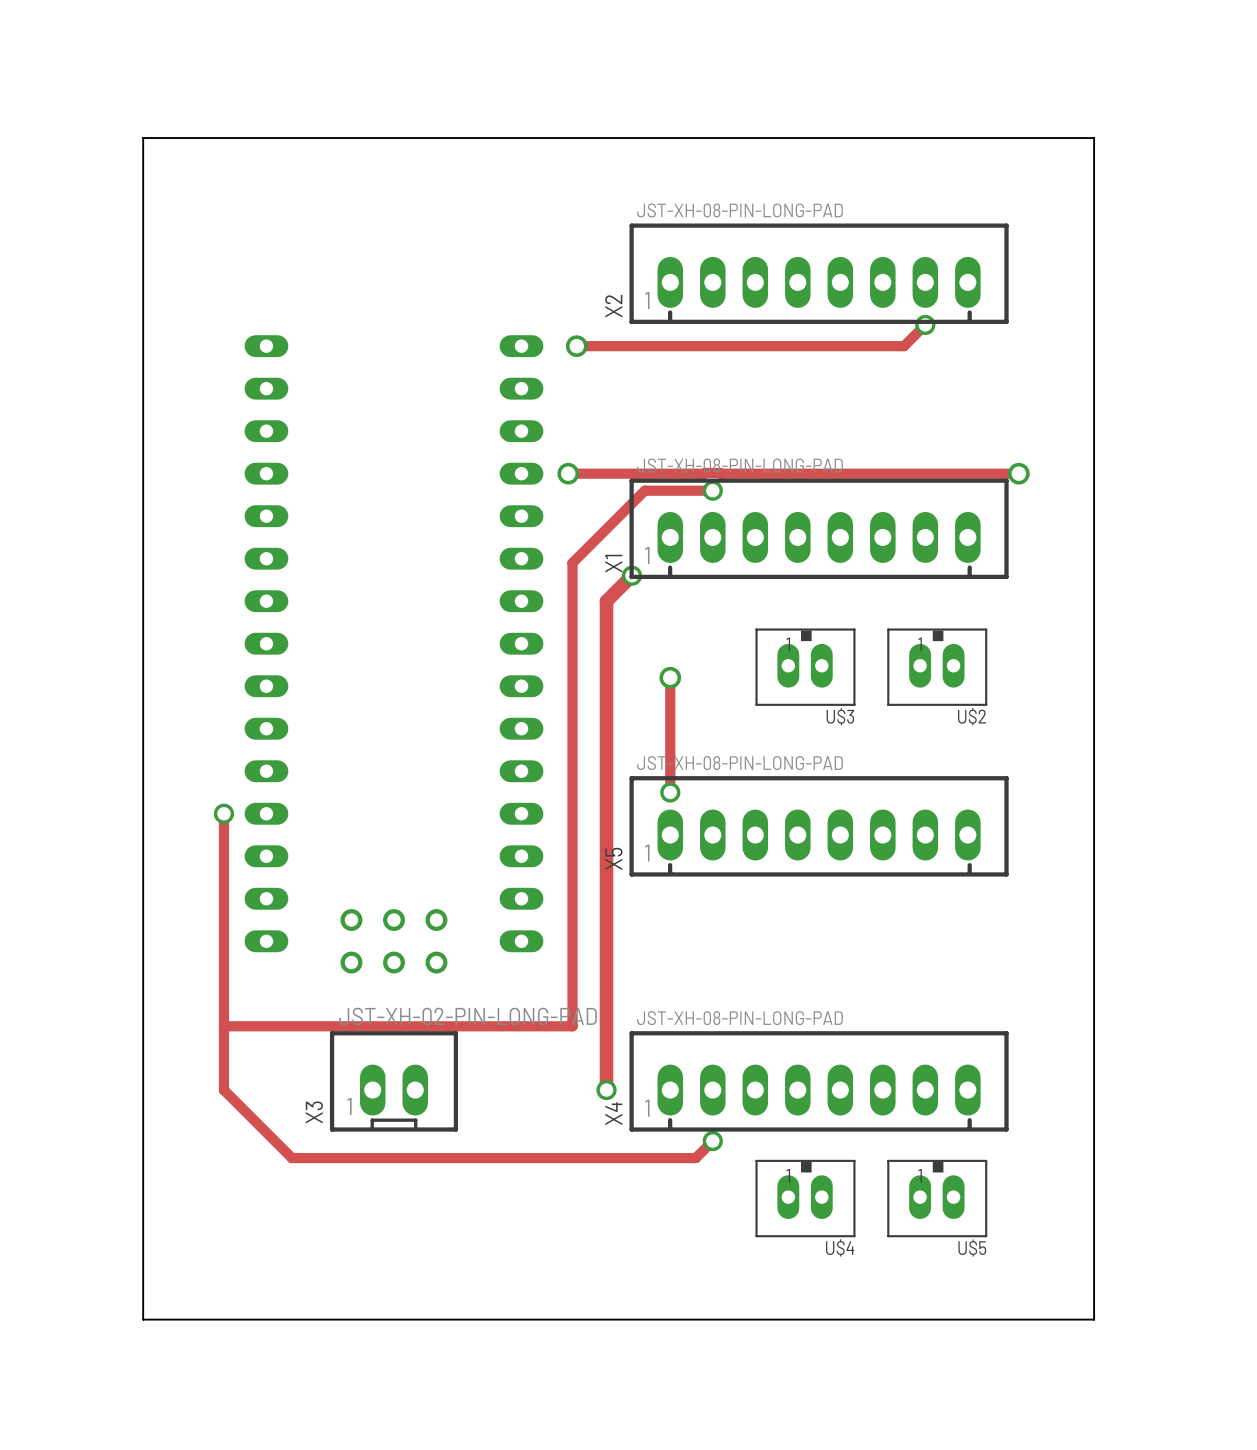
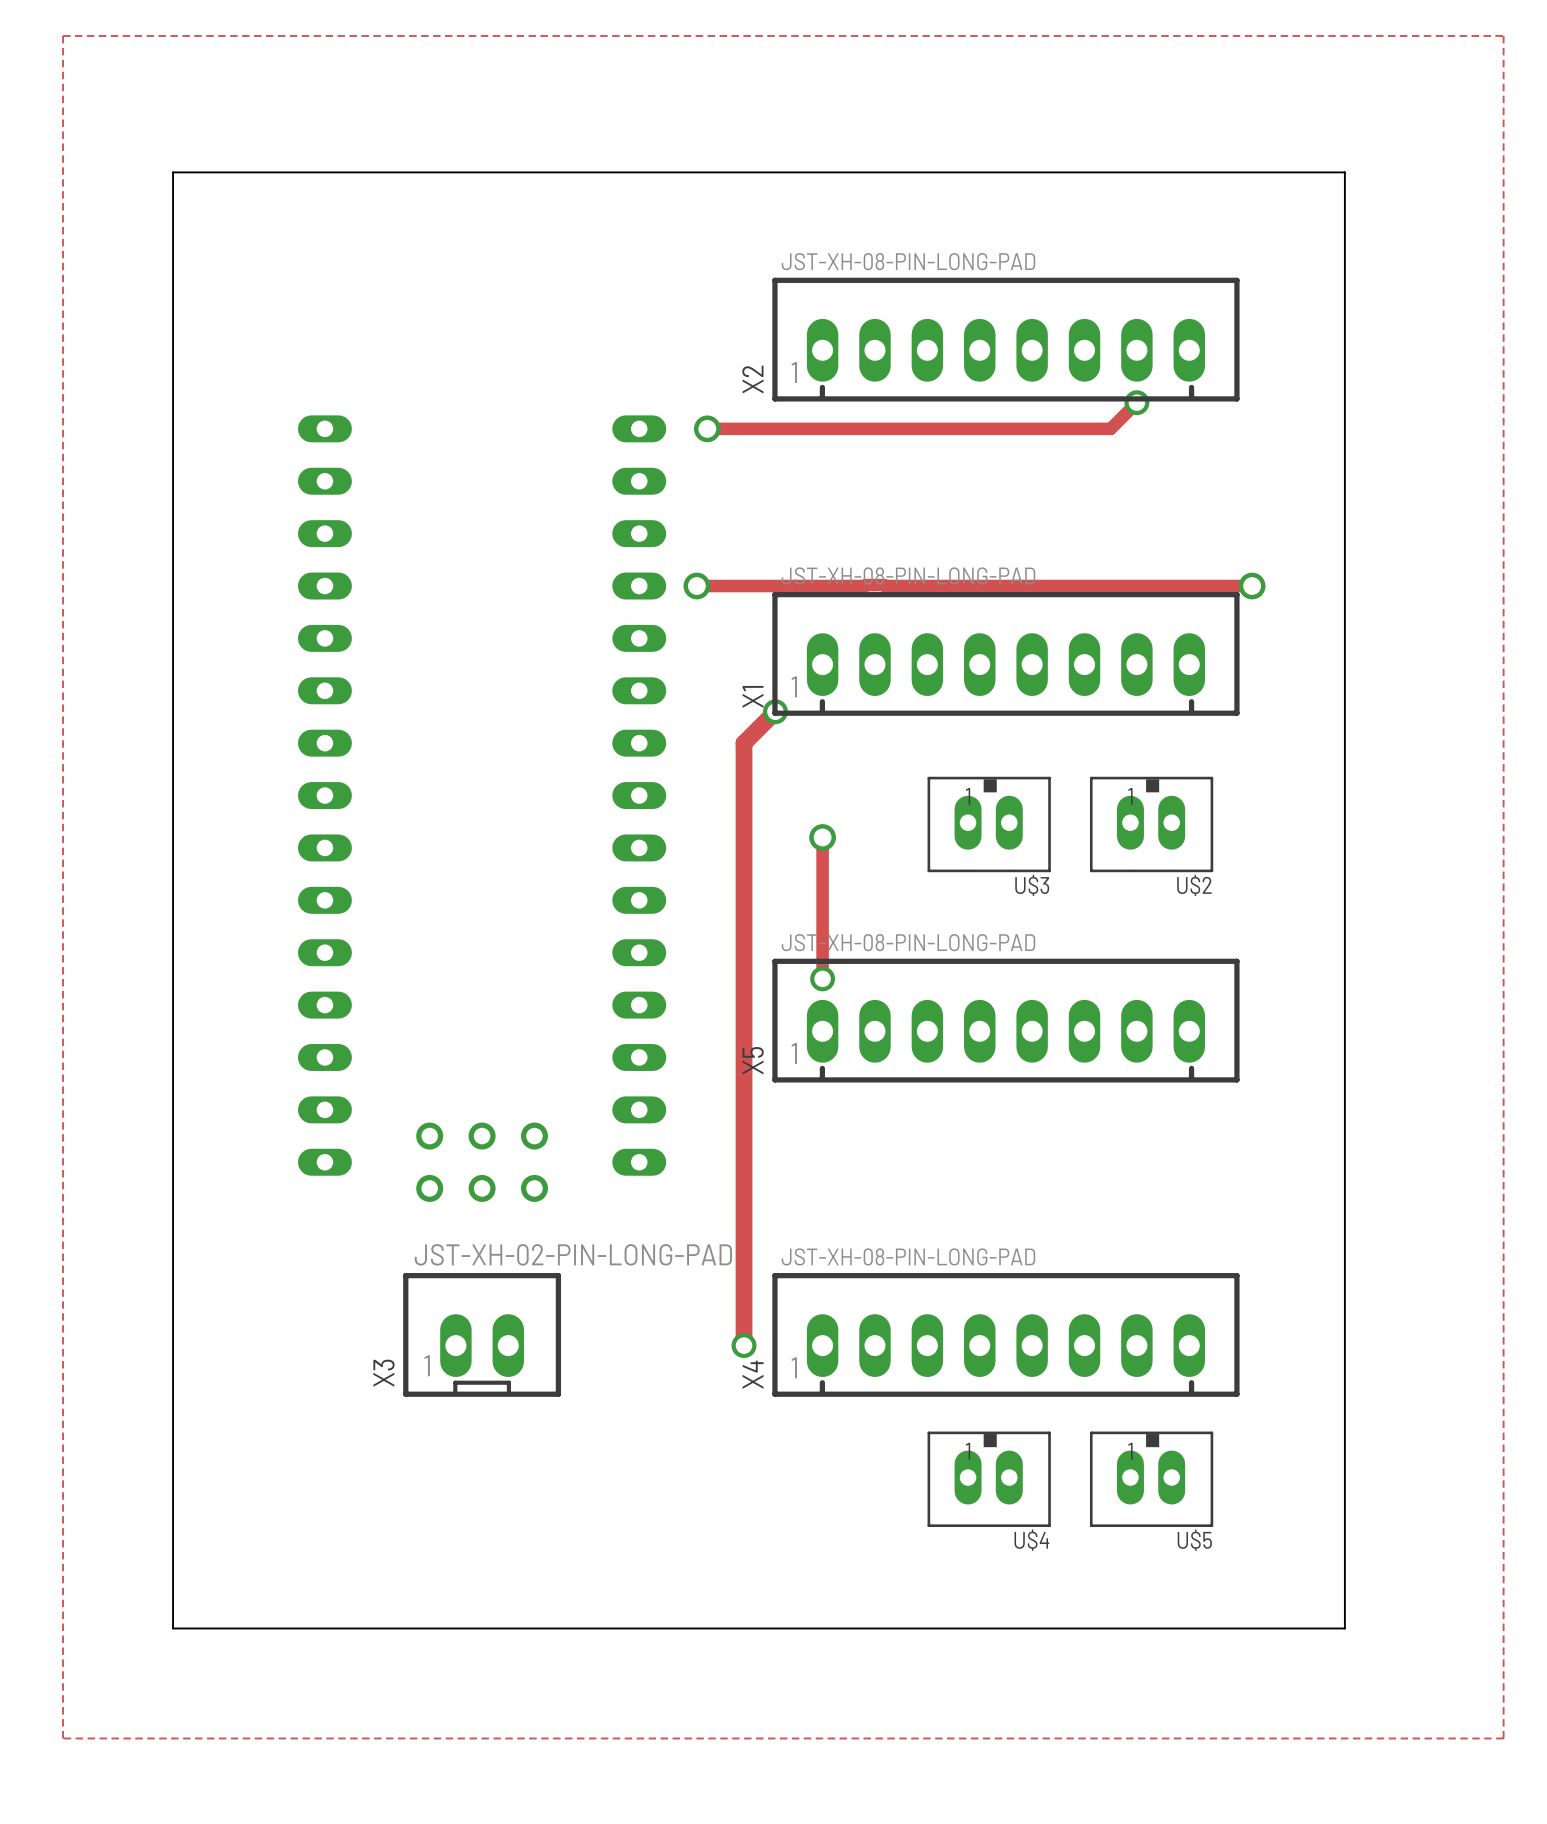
zone outline: none -> (63, 35) (1503, 35) (1503, 1738) (63, 1738) (63, 35)
track: (712, 490) (644, 490) (572, 562) (572, 1026) (223, 1026) -> none
via: (712, 490) -> none
via: (223, 813) -> none
track: (223, 1090) (223, 813) (223, 1090) -> none
track: (223, 1090) (291, 1158) (695, 1158) (712, 1141) -> none
via: (712, 1141) -> none

